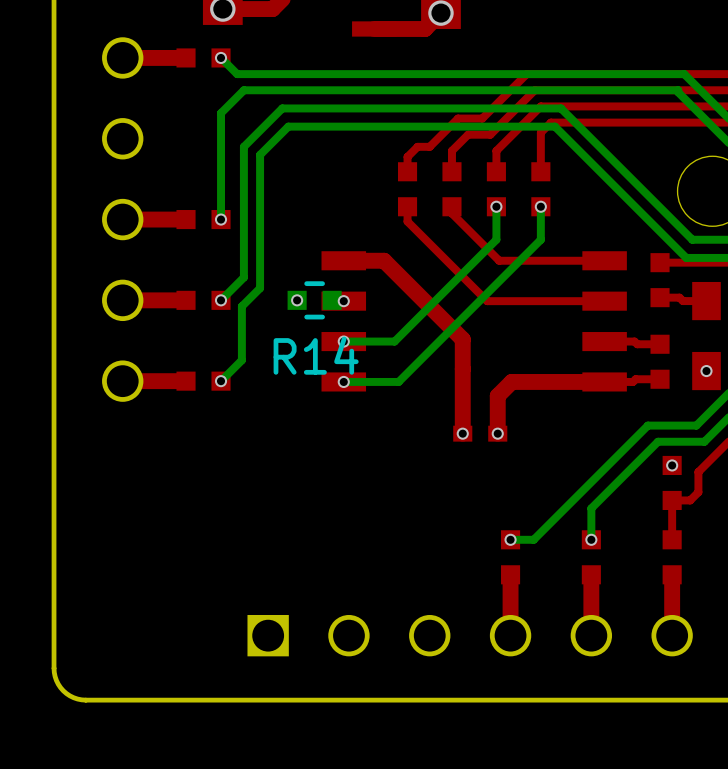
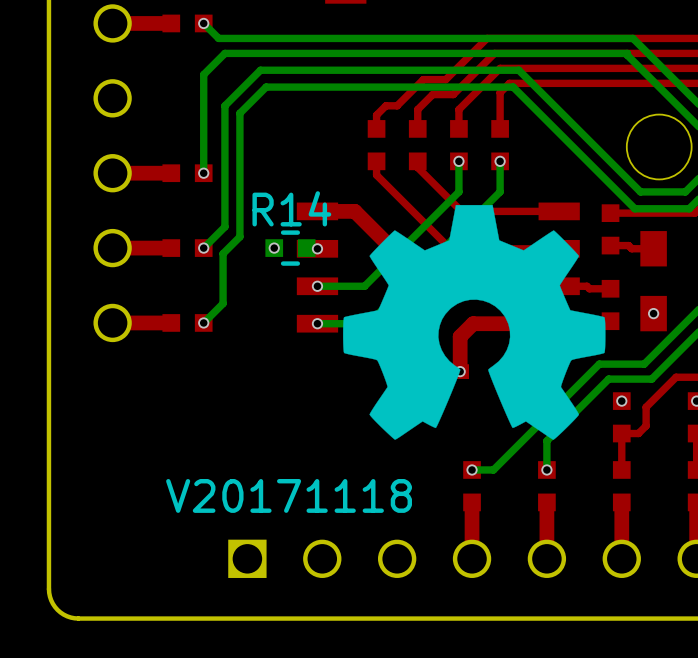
drawing: none -> [343, 204, 606, 440]
R14 name position: R14 (316, 355) -> R14 (291, 208)

